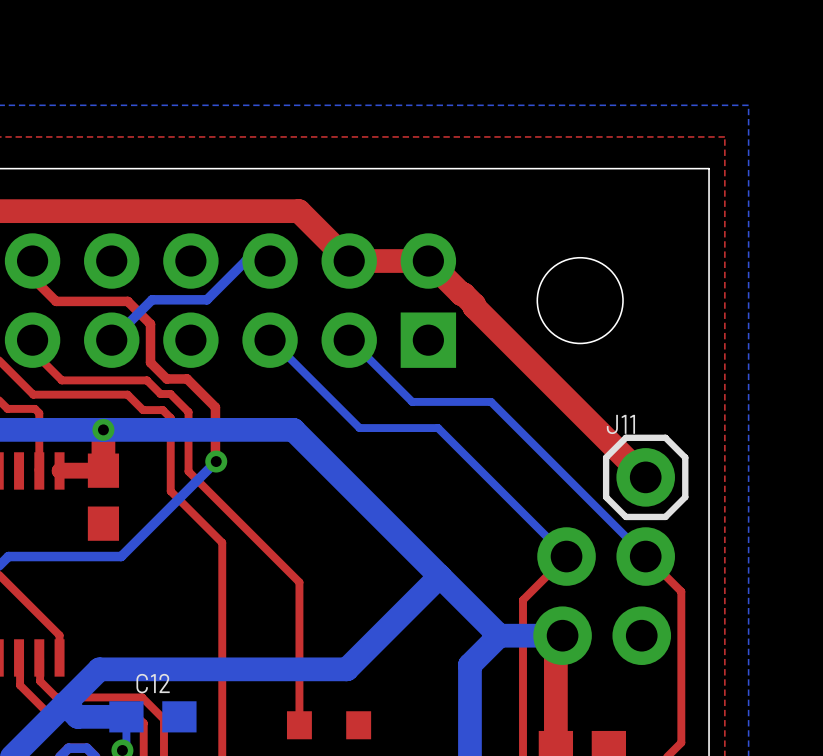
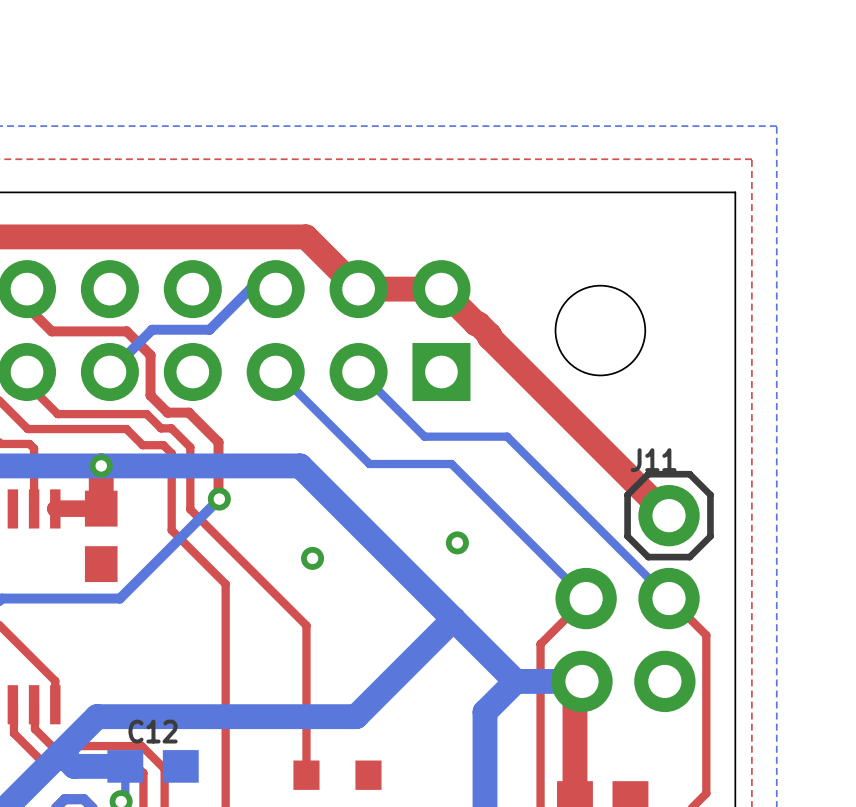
via: none -> (457, 542)
via: none -> (312, 558)

